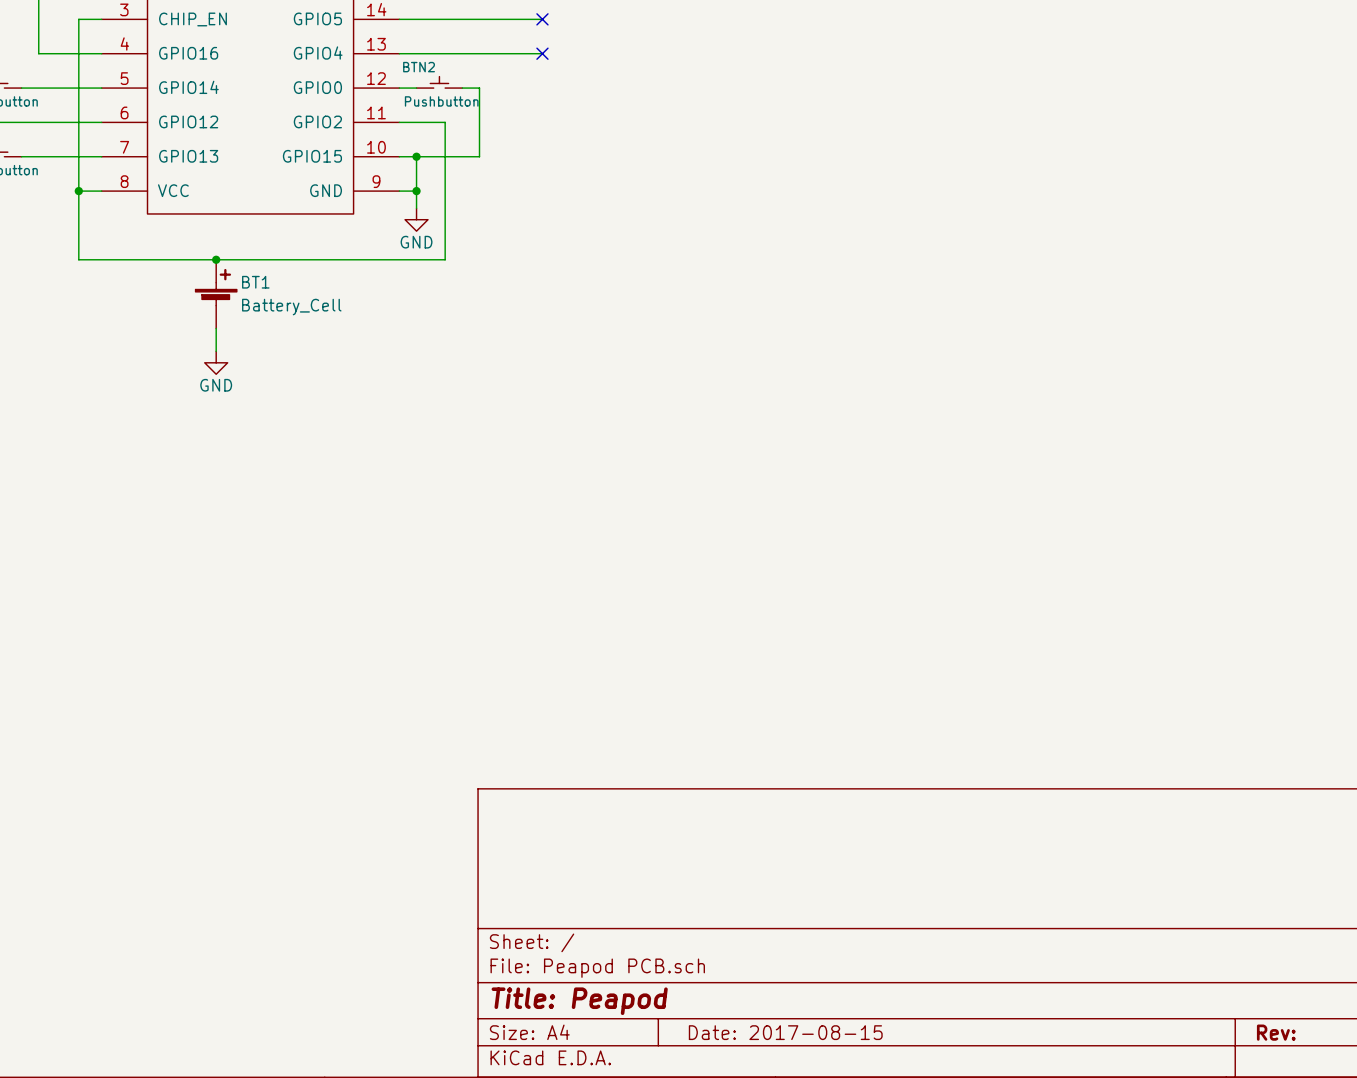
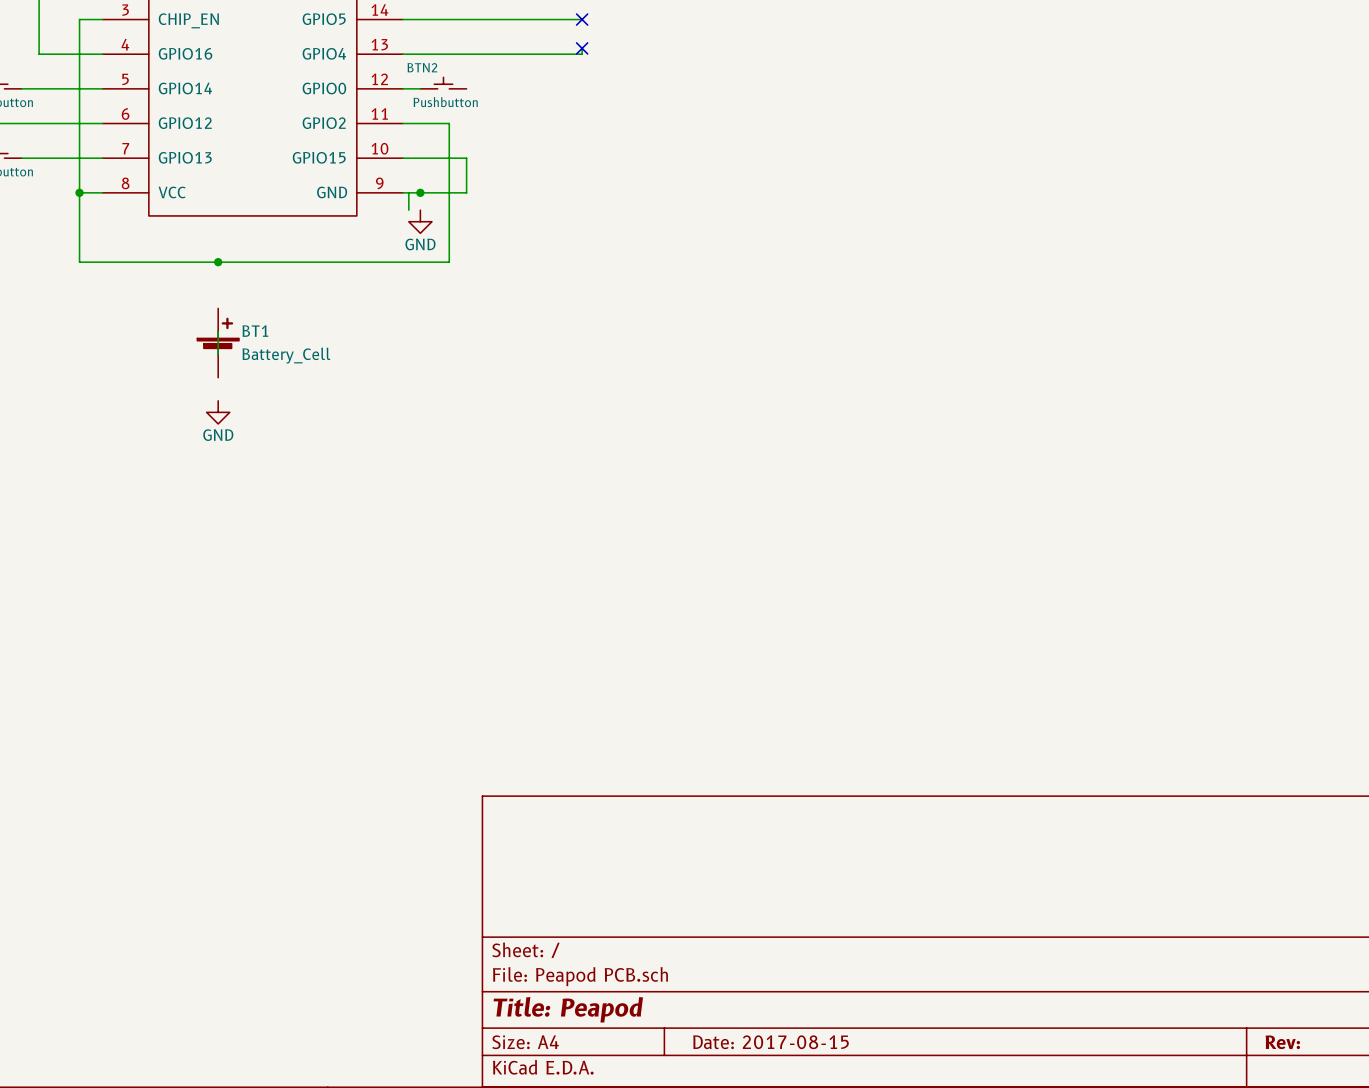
wire: none -> (547, 19) (582, 19)
no-connect mark: (542, 19) -> none
no-connect mark: none -> (582, 19)
wire: none -> (582, 48) (582, 54) (547, 54)
no-connect mark: none -> (582, 48)
no-connect mark: (542, 53) -> none
wire: (462, 88) (479, 88) (479, 156) (462, 156) -> (420, 192) (466, 192) (466, 158)
wire: (416, 156) (416, 208) -> none
junction: (416, 156) -> none
wire: none -> (408, 192) (408, 210)
BT1 position: (216, 294) -> (218, 343)
power symbol position: GND (216, 362) -> GND (218, 412)

